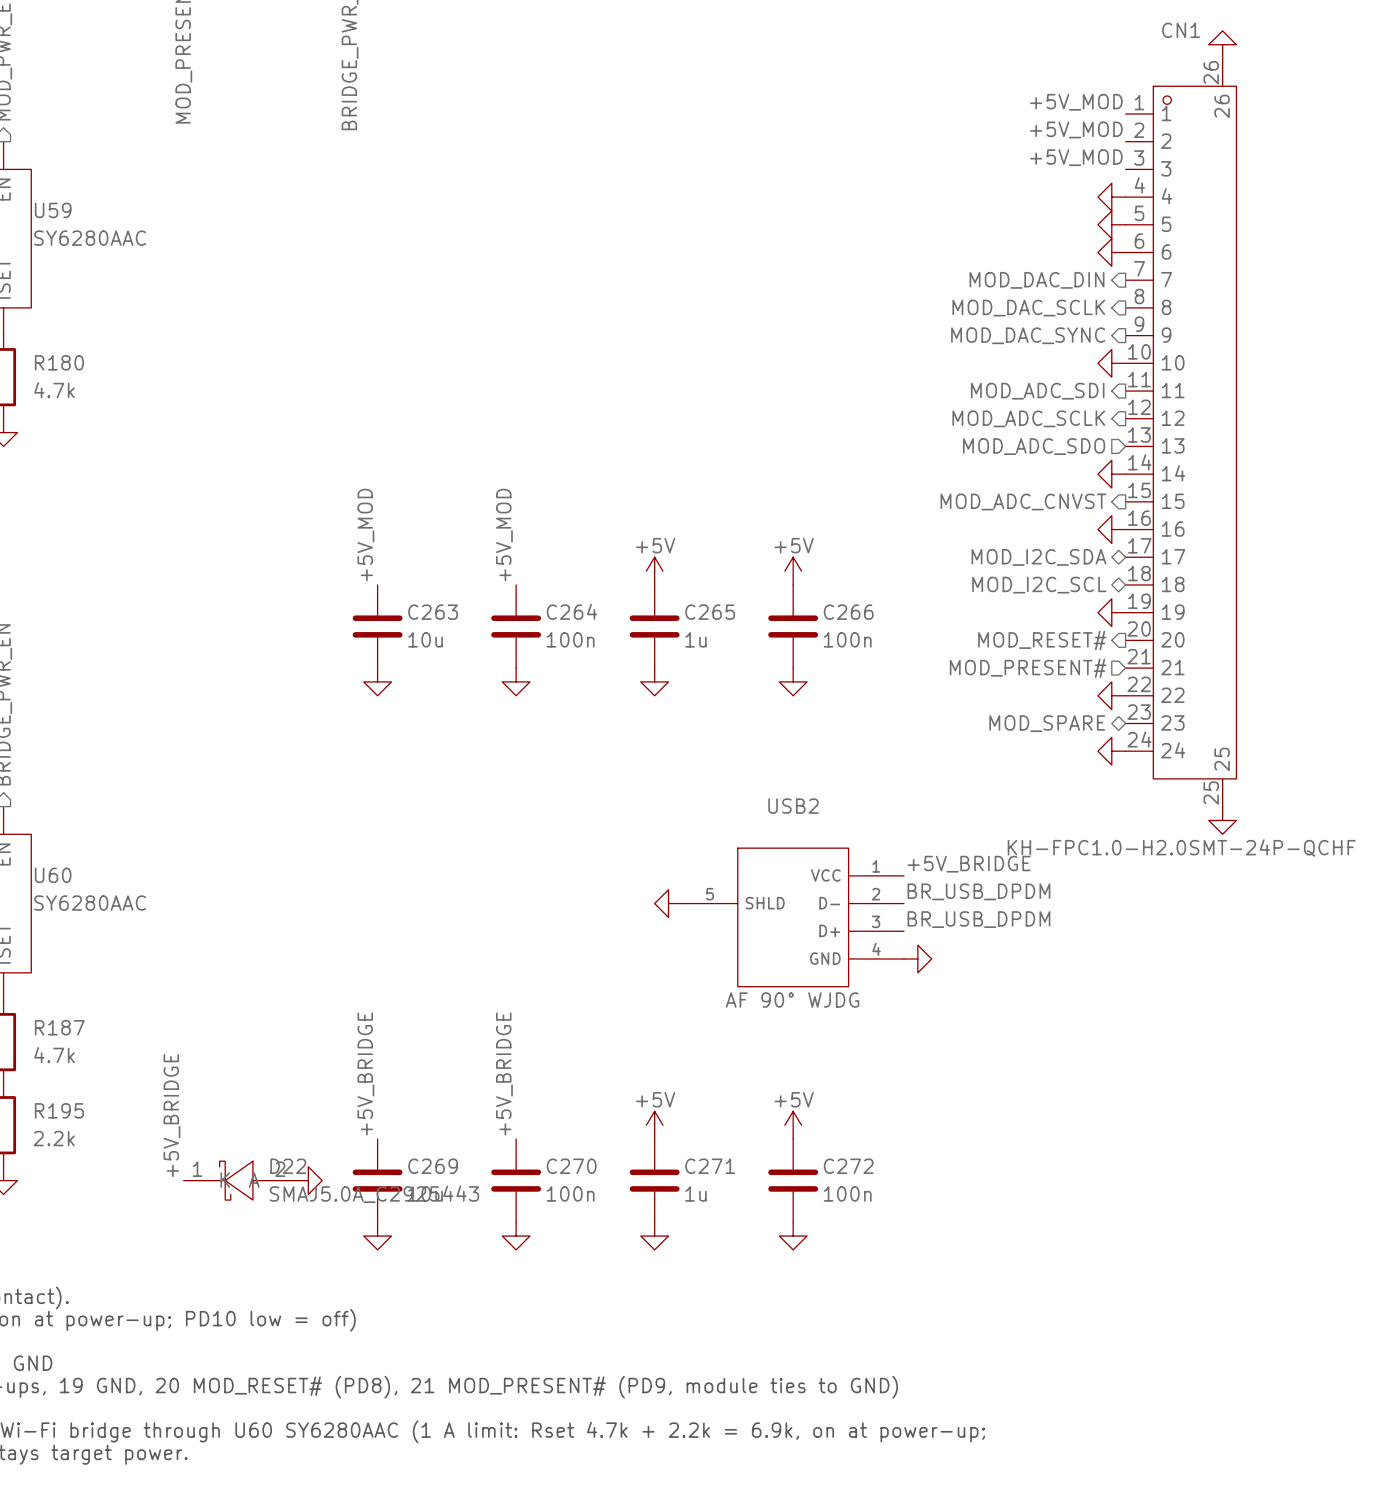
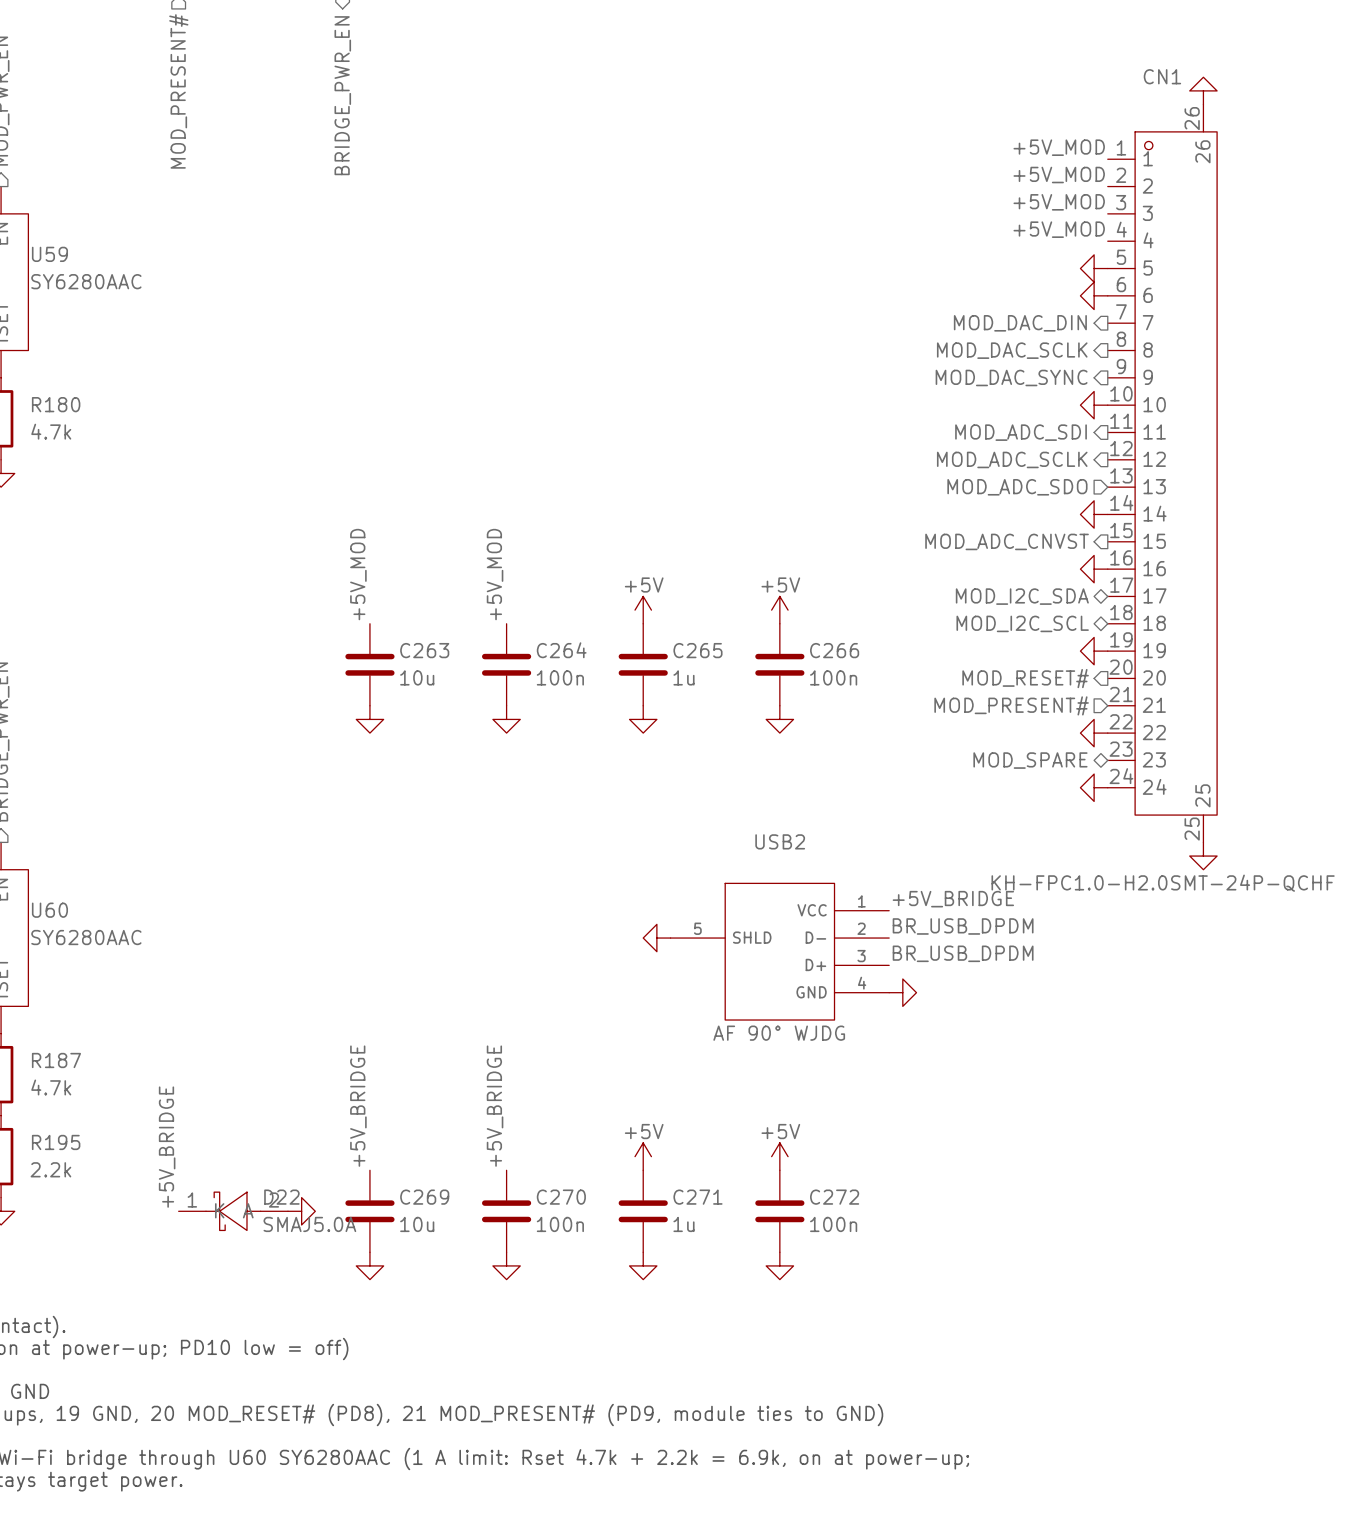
label: none -> +5V_MOD (1059, 229)
power symbol: (1111, 197) -> none
D22 value: SMAJ5.0A_C2925443 (374, 1194) -> SMAJ5.0A (309, 1224)

